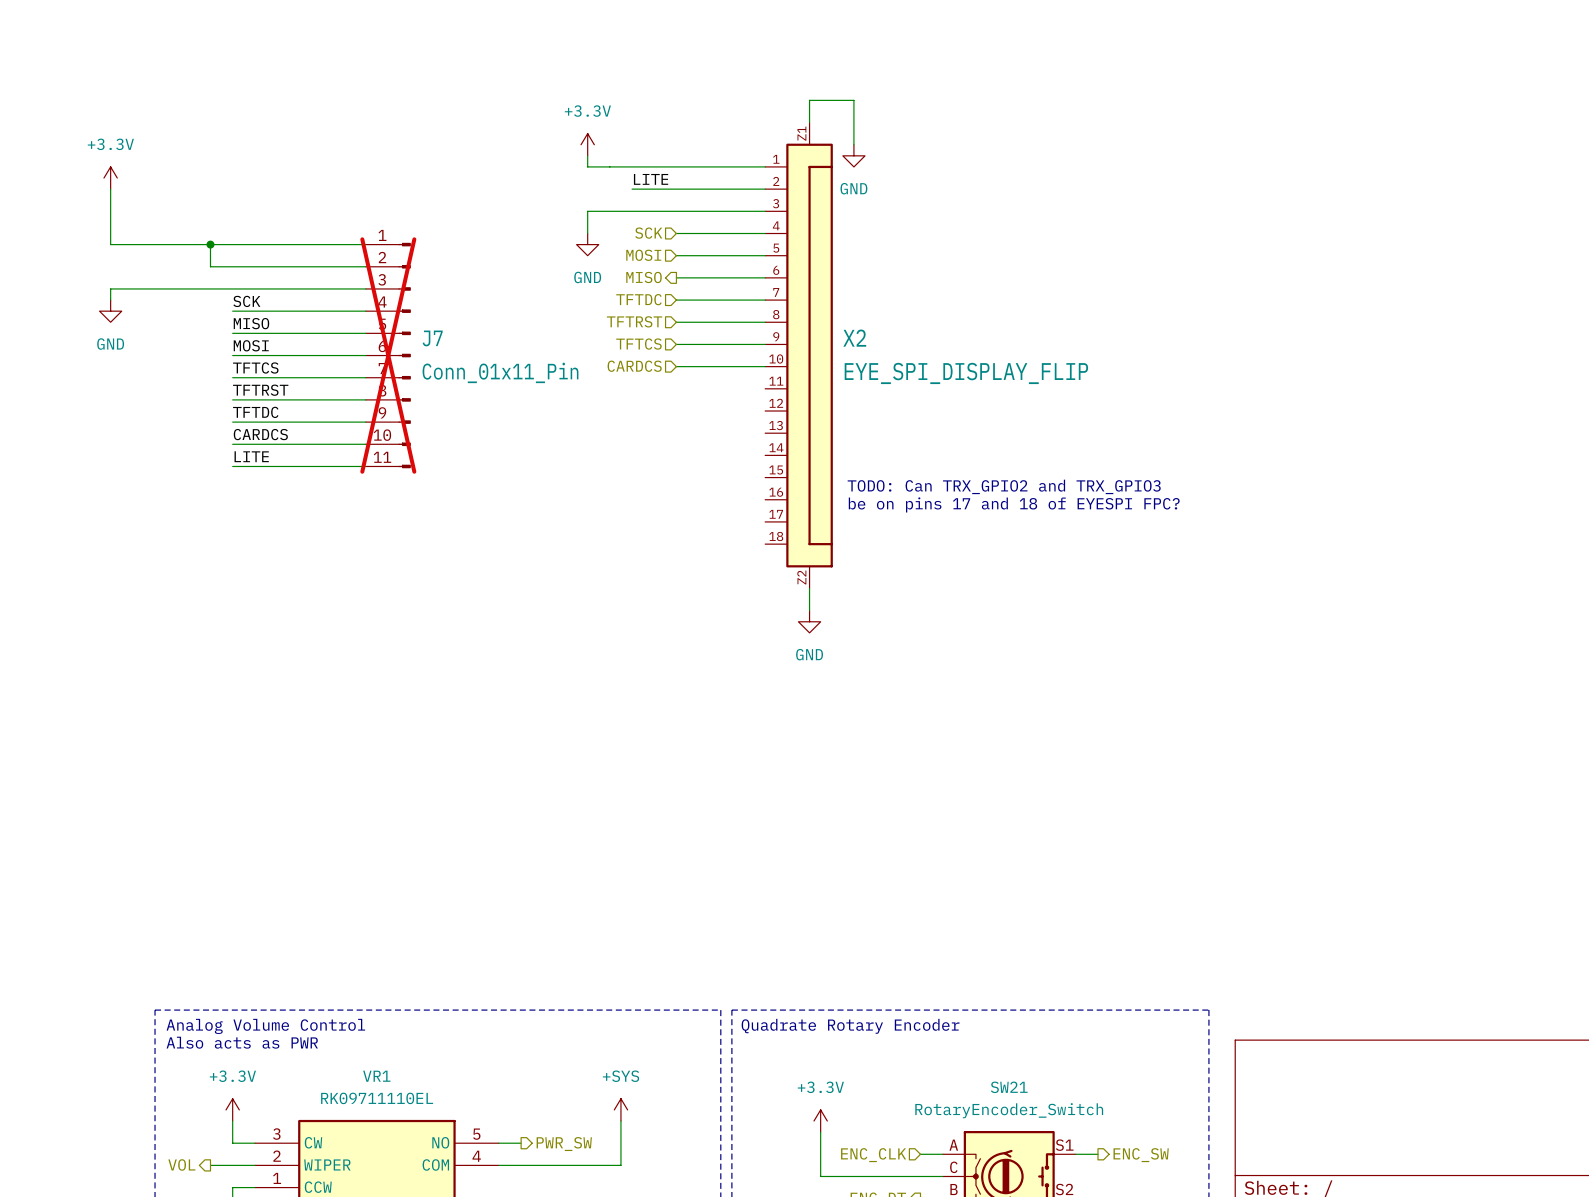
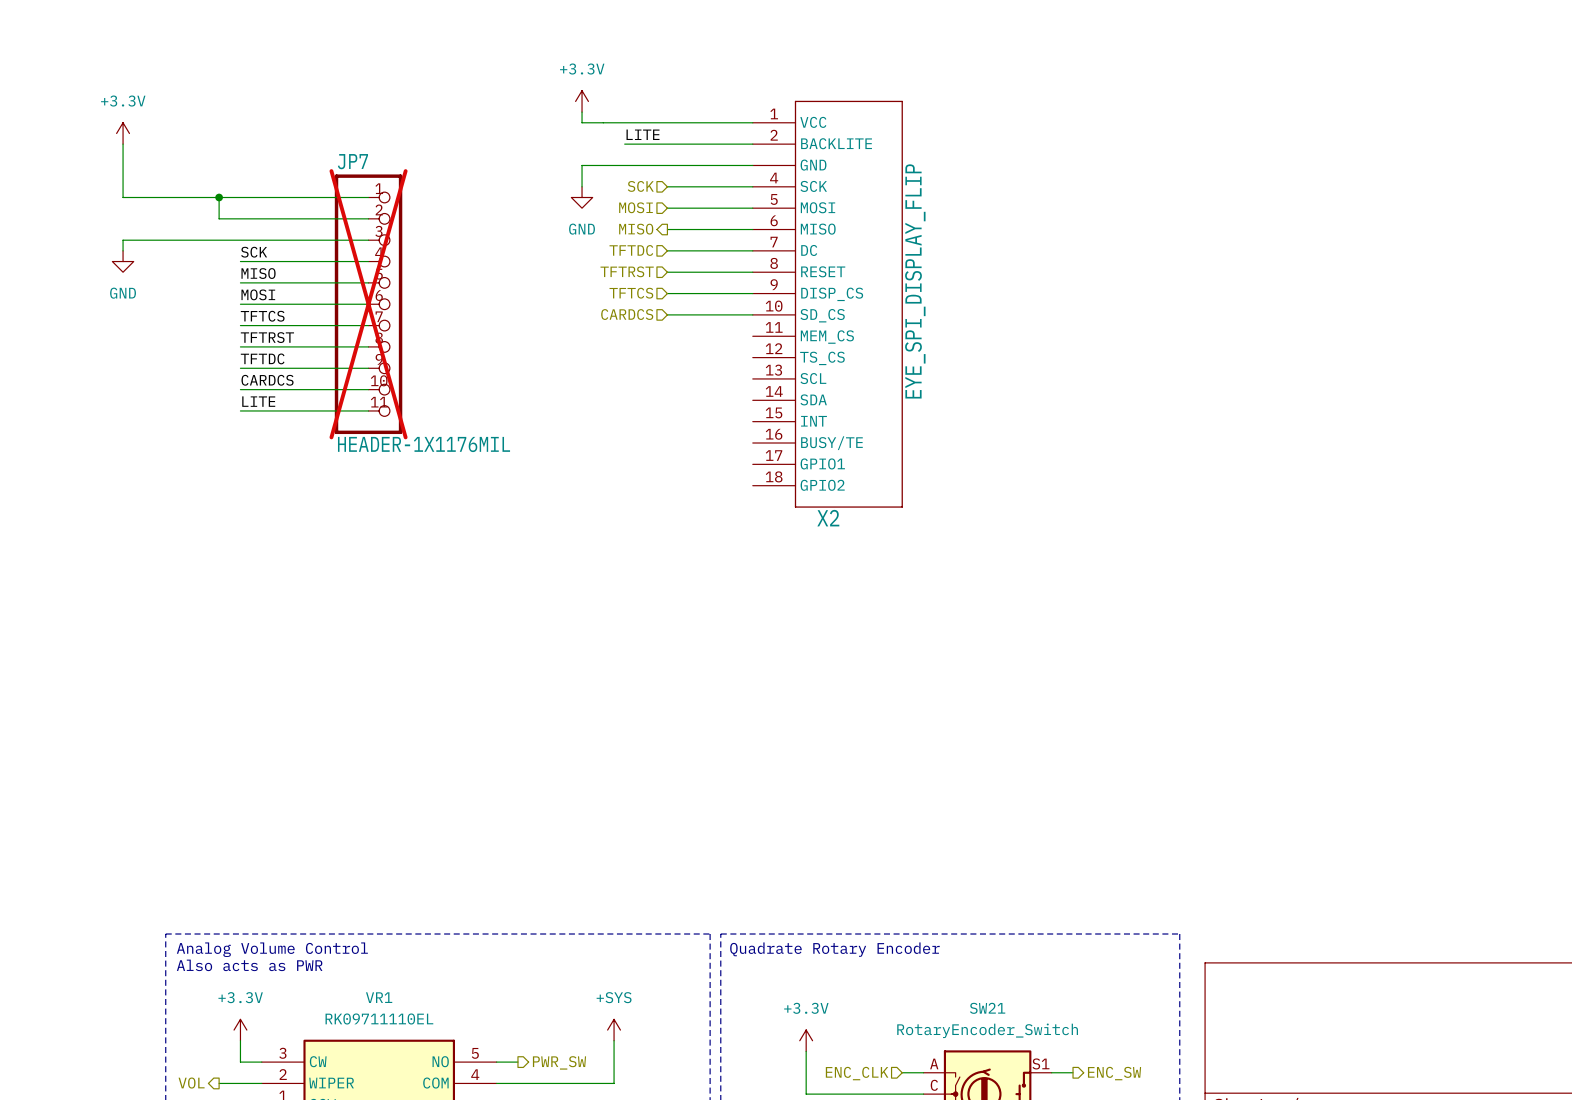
X2 symbol: [765, 122, 833, 589] -> [752, 100, 903, 508]
wire: (809, 122) (809, 100) (853, 100) (853, 144) -> none
power symbol: GND (853, 155) -> none
X2 name position: X2 (854, 338) -> X2 (828, 518)
JP7: none -> HEADER-1X1176MIL (368, 304)
J7: Conn_01x11_Pin (388, 355) -> none
X2 value position: EYE_SPI_DISPLAY_FLIP (966, 373) -> EYE_SPI_DISPLAY_FLIP (915, 281)
text: TODO: Can TRX_GPIO2 and TRX_GPIO3 (1004, 486) -> none
text: be on pins 17 and 18 of EYESPI FPC? (1014, 504) -> none
wire: (809, 588) (809, 610) -> none
power symbol: GND (809, 621) -> none

